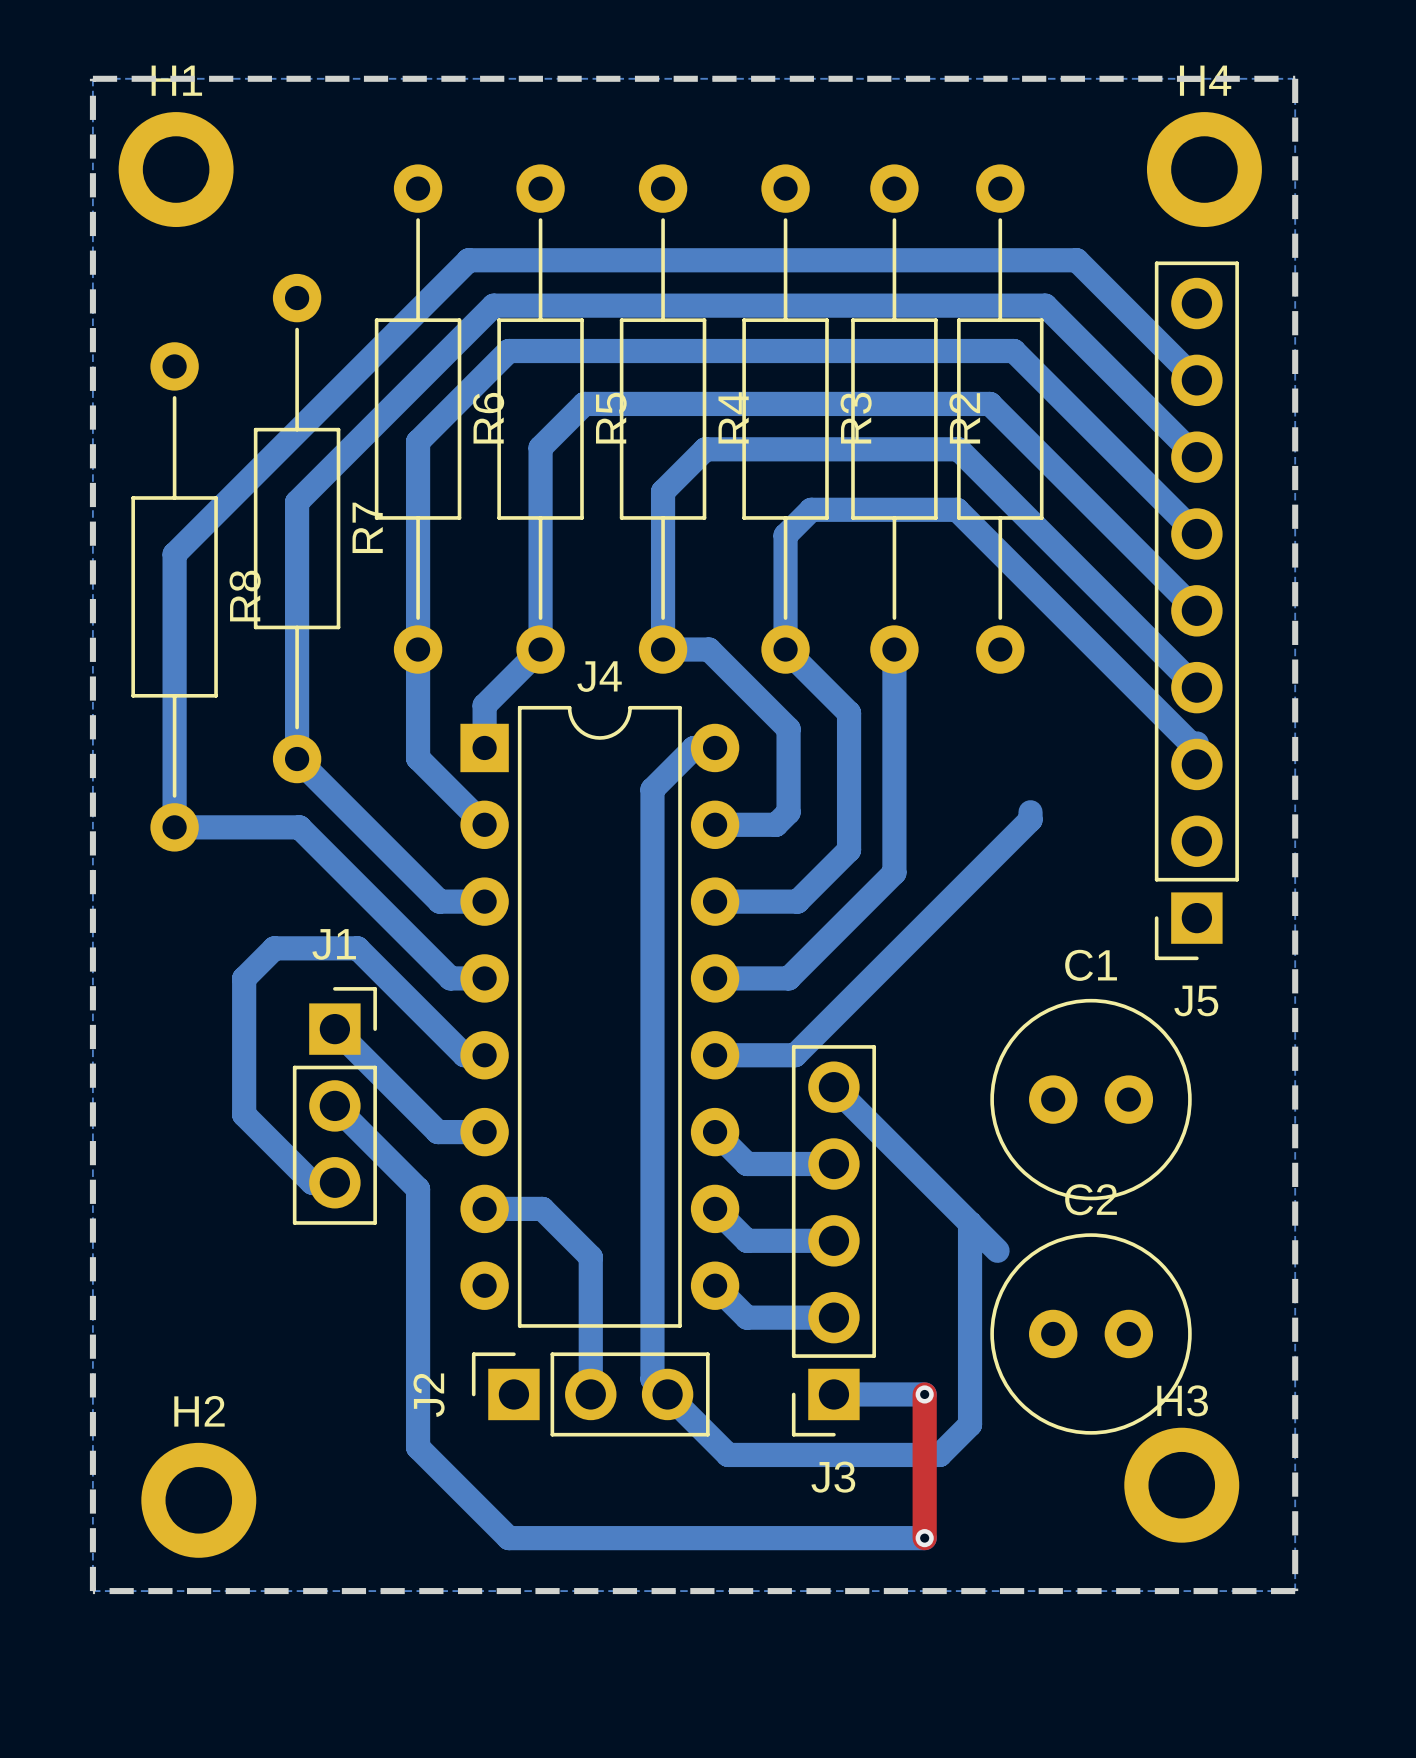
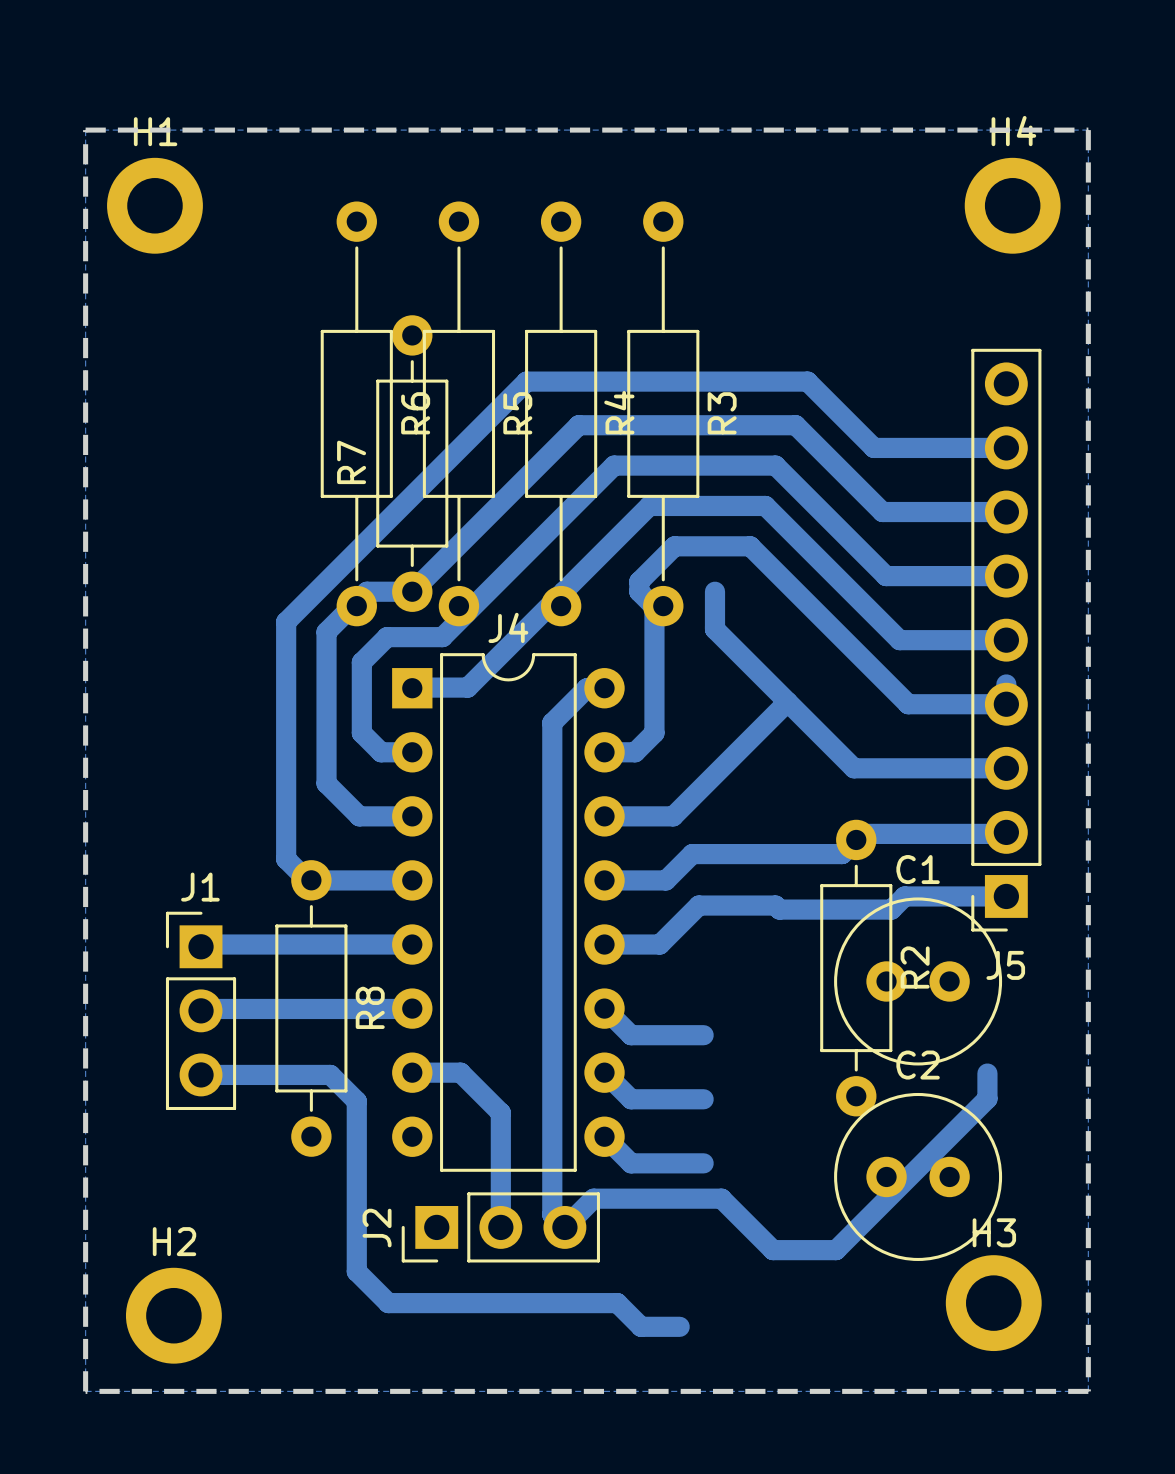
R2 footprint: [851, 164, 938, 674] -> [820, 819, 893, 1117]
R7 footprint: [253, 273, 341, 784] -> [376, 315, 449, 612]
R8 footprint: [131, 342, 218, 852] -> [275, 860, 348, 1157]
bottom track: (1196, 380) (1076, 260) (468, 260) (174, 554) (174, 827) (299, 827) (450, 978) -> (1006, 447) (873, 447) (807, 381) (526, 381) (286, 622) (286, 859) (307, 880) (383, 880)
part: (1000, 419) -> none
bottom track: (1196, 457) (1045, 305) (493, 305) (297, 502) (297, 759) (439, 901) -> (1006, 512) (882, 512) (795, 425) (578, 425) (412, 591) (366, 591) (326, 632) (326, 783) (359, 816) (374, 816)
R7 name position: R7 (367, 527) -> R7 (351, 462)
bottom track: (1196, 533) (1013, 351) (508, 351) (418, 441) (418, 758) (484, 824) -> (1006, 576) (886, 576) (775, 465) (614, 465) (442, 637) (387, 637) (361, 662) (361, 732) (381, 752) (412, 752)
bottom track: (1196, 610) (990, 403) (584, 403) (540, 447) (540, 649) (484, 705) (484, 747) -> (1006, 640) (899, 640) (765, 505) (649, 505) (467, 687) (412, 688)
J5 position: (1196, 610) -> (1006, 640)
bottom track: none -> (715, 591) (715, 629) (854, 768) (1006, 768)
bottom track: (894, 649) (894, 872) (820, 946) -> (1006, 832) (862, 833) (842, 854) (692, 854)
bottom track: (1196, 687) (958, 449) (705, 449) (663, 491) (663, 649) (709, 649) (788, 729) (788, 812) (776, 824) (751, 824) -> (1006, 704) (908, 704) (750, 546) (674, 546) (639, 581) (639, 591) (654, 606) (654, 732) (635, 752)
bottom track: (1196, 749) (957, 509) (811, 509) (785, 535) (785, 649) (849, 713) (849, 850) -> (787, 701) (716, 773)
bottom track: (1030, 812) (1030, 819) (795, 1055) (781, 1055) -> (1006, 896) (904, 896) (891, 909) (779, 909) (775, 905) (698, 905) (659, 944)
J1 footprint: [292, 987, 377, 1225] -> [165, 911, 237, 1111]
bottom track: (334, 1029) (437, 1132) (484, 1132) -> (201, 1010) (202, 1008) (412, 1008)
bottom track: (464, 1055) (357, 948) (274, 948) (244, 978) (244, 1114) (312, 1182) (334, 1182) -> (395, 944) (203, 944) (201, 946)
bottom track: (833, 1087) (997, 1250) -> none
bottom track: (334, 1105) (418, 1189) (418, 1243) -> (201, 1074) (330, 1074) (356, 1101)
bottom track: (970, 1223) (970, 1424) (939, 1454) (728, 1454) (667, 1394) -> (987, 1073) (987, 1098) (836, 1250) (773, 1250) (721, 1198) (593, 1198) (564, 1227)
J3: (833, 1240) -> none
J2 footprint: [471, 1352, 710, 1437] -> [401, 1192, 600, 1263]
bottom track: (833, 1394) (924, 1394) -> none
top track: (924, 1394) (924, 1538) -> none
via: (924, 1394) -> none
bottom track: (455, 1485) (508, 1538) (924, 1538) -> (388, 1303) (617, 1303) (641, 1326) (679, 1326)
via: (924, 1538) -> none

